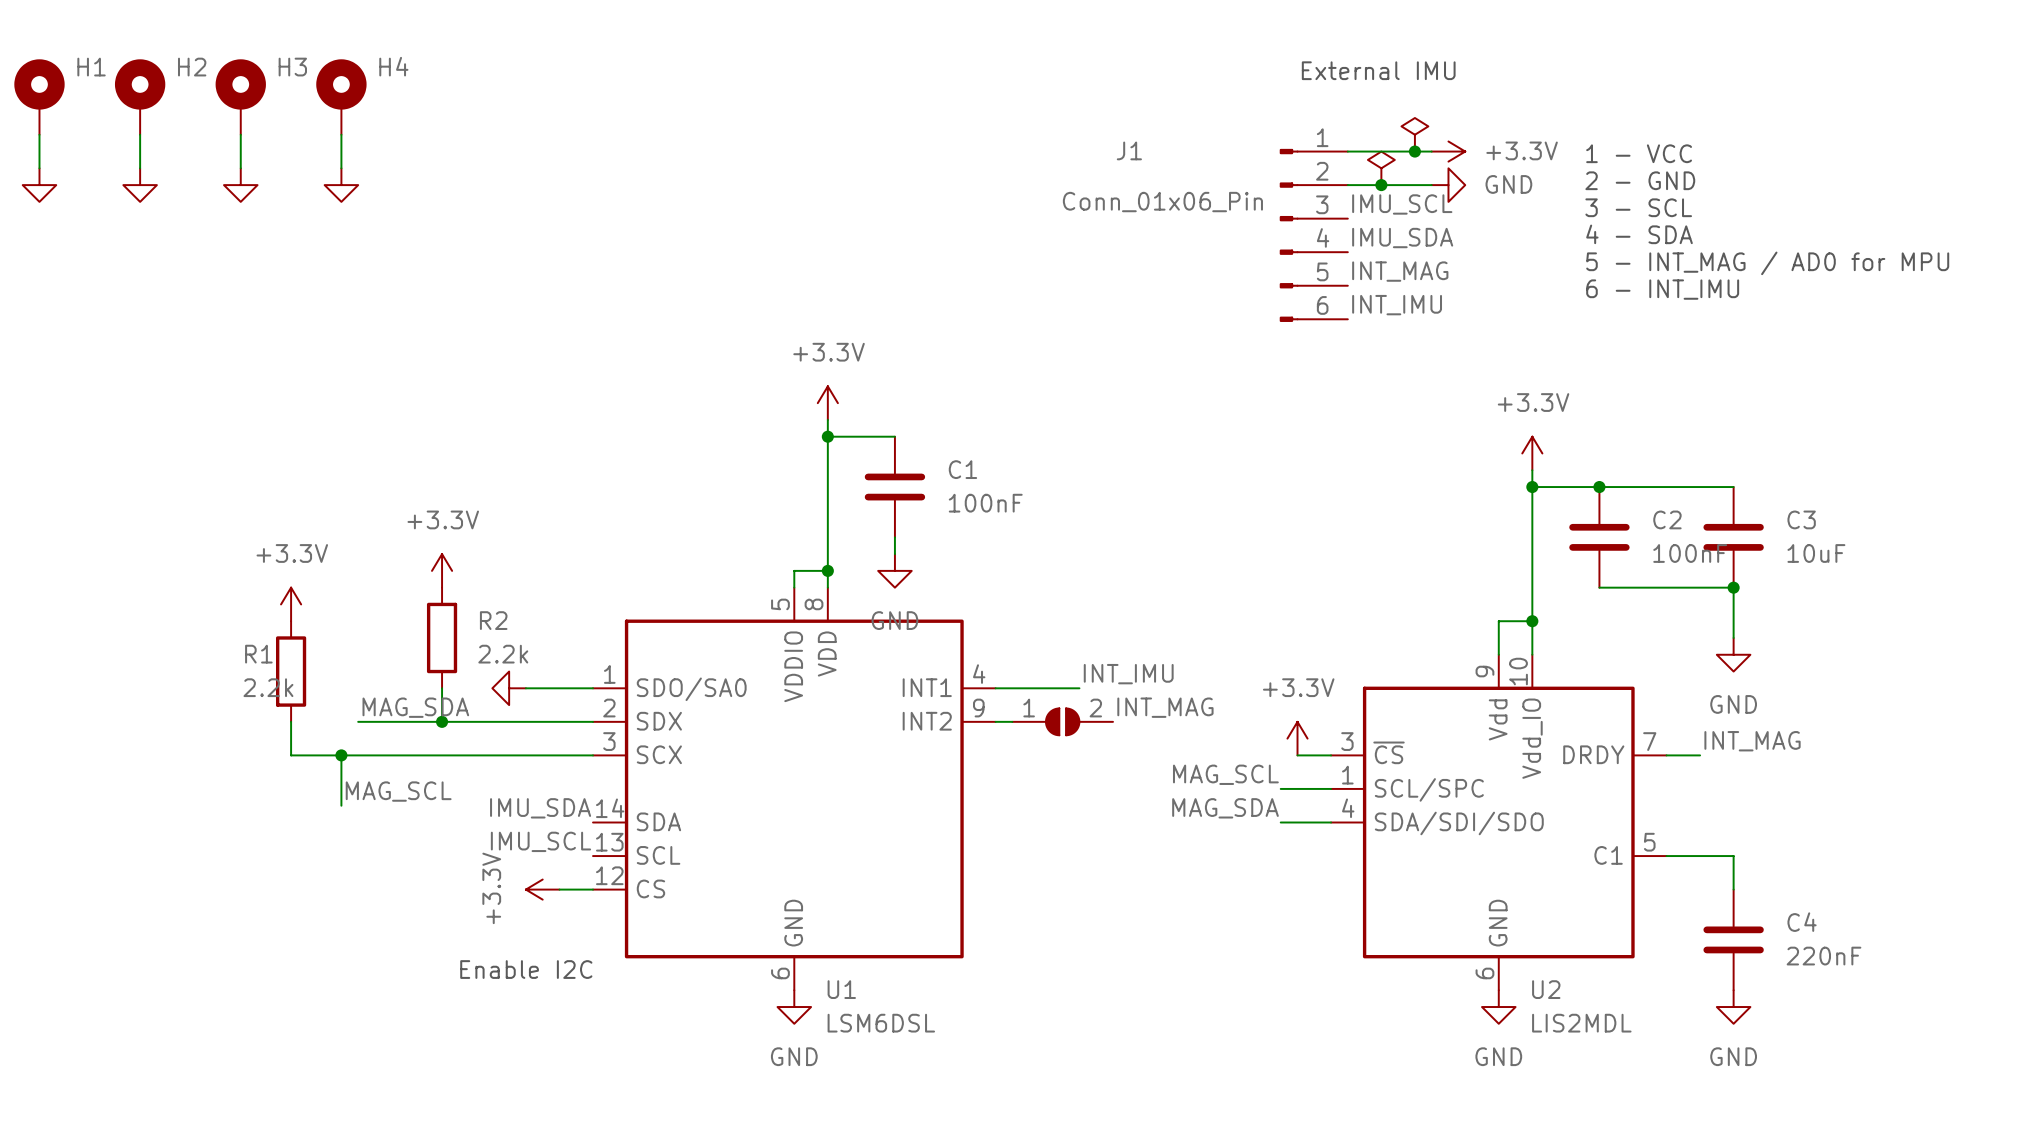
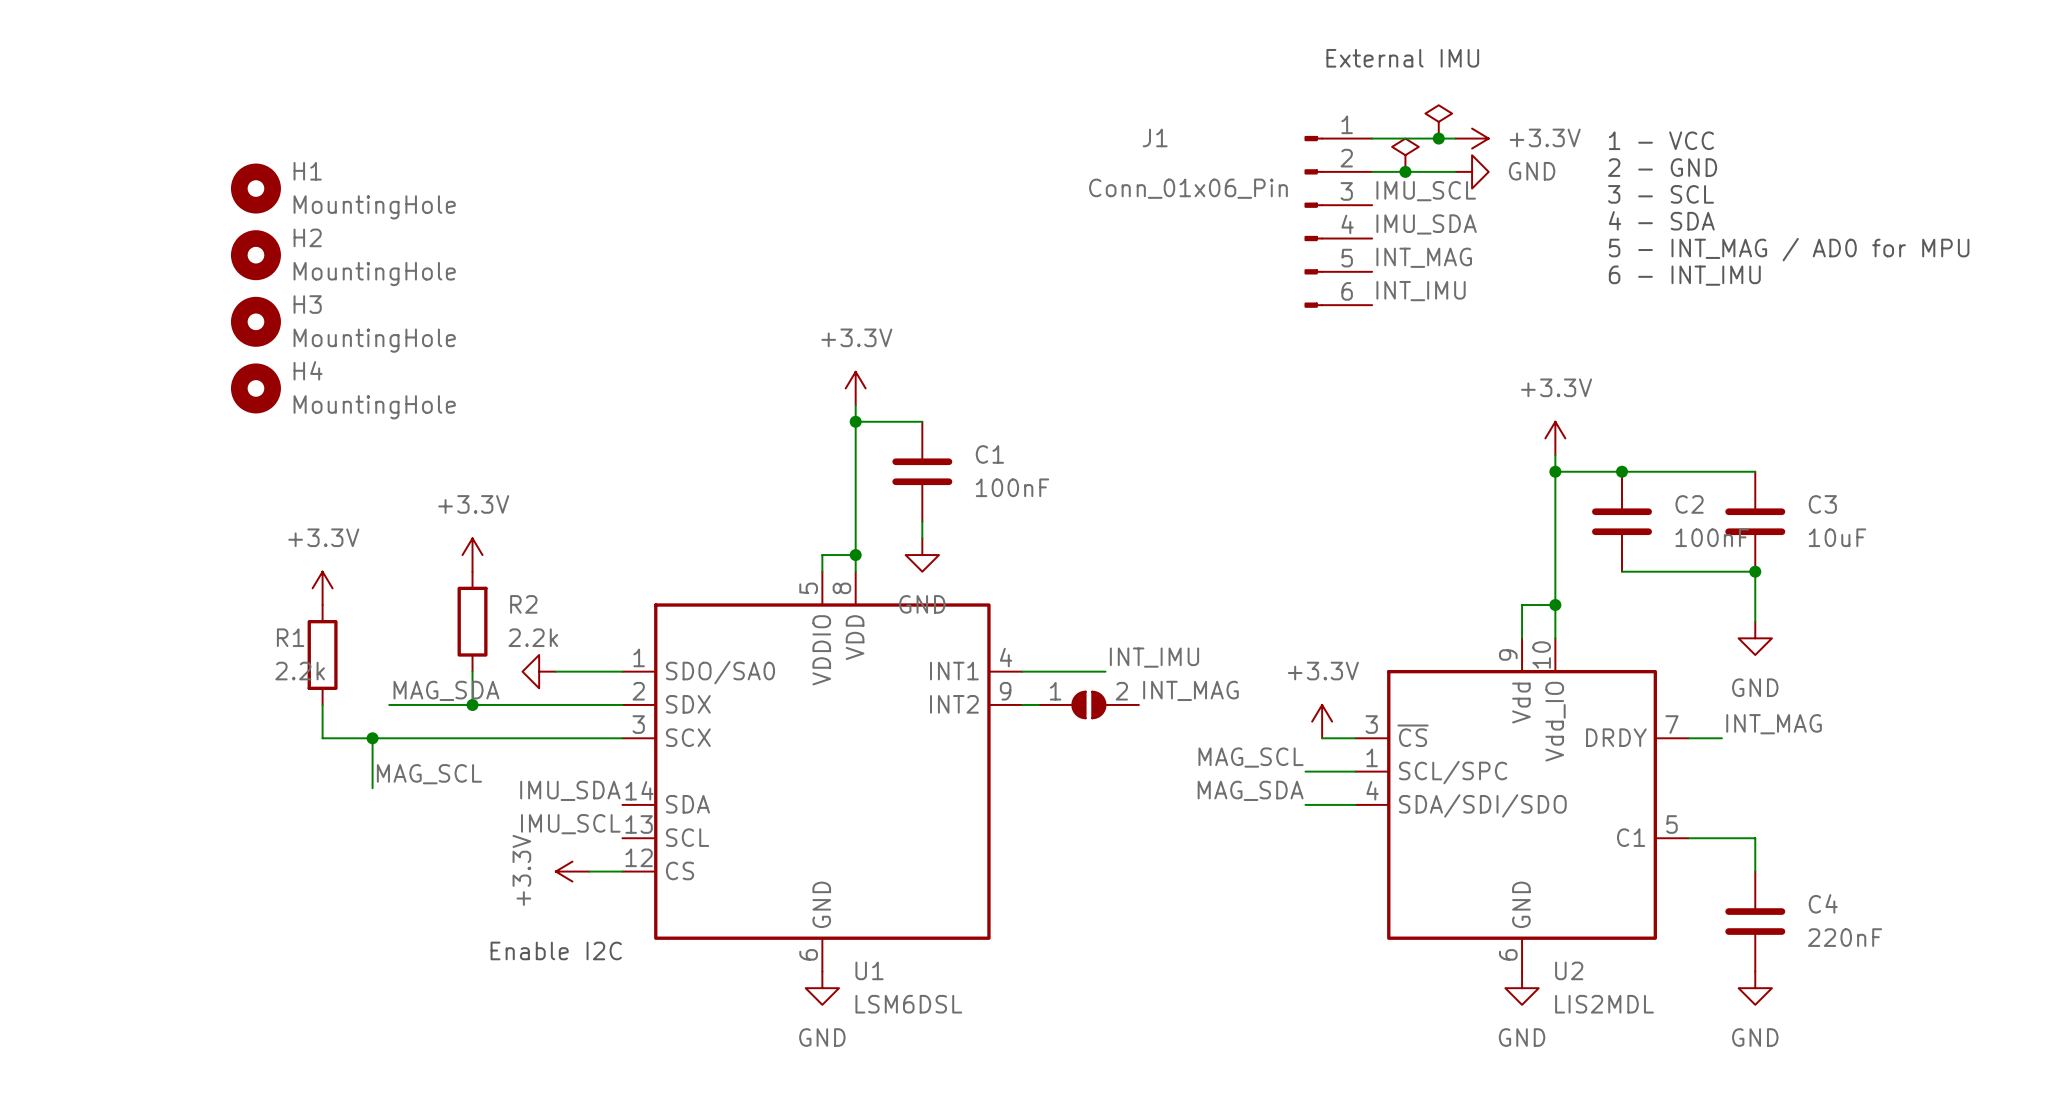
H1 symbol: [14, 59, 65, 135] -> [230, 163, 281, 214]
H2 symbol: [114, 59, 166, 135] -> [230, 230, 281, 281]
H3 symbol: [215, 59, 266, 135] -> [230, 296, 281, 347]
H4 symbol: [316, 59, 367, 135] -> [230, 363, 281, 414]
wire: (39, 134) (39, 168) -> none
wire: (140, 134) (140, 168) -> none
wire: (240, 134) (240, 168) -> none
wire: (341, 134) (341, 168) -> none
power symbol: (39, 185) -> none
power symbol: (140, 185) -> none
power symbol: (240, 185) -> none
power symbol: (341, 185) -> none
H1 value: none -> MountingHole (374, 207)
H2 value: none -> MountingHole (374, 273)
H3 value: none -> MountingHole (374, 340)
H4 value: none -> MountingHole (374, 407)

